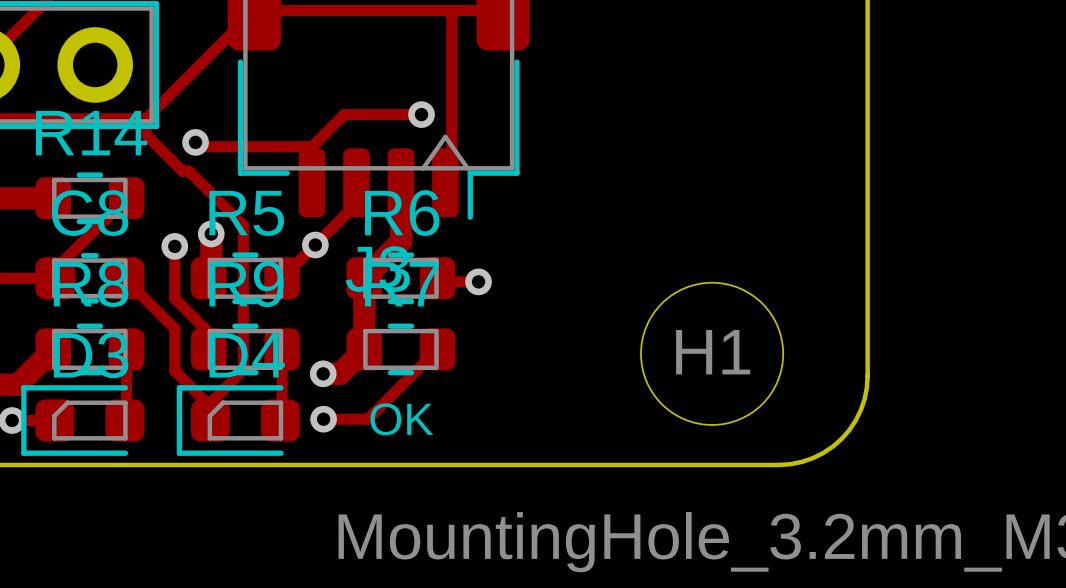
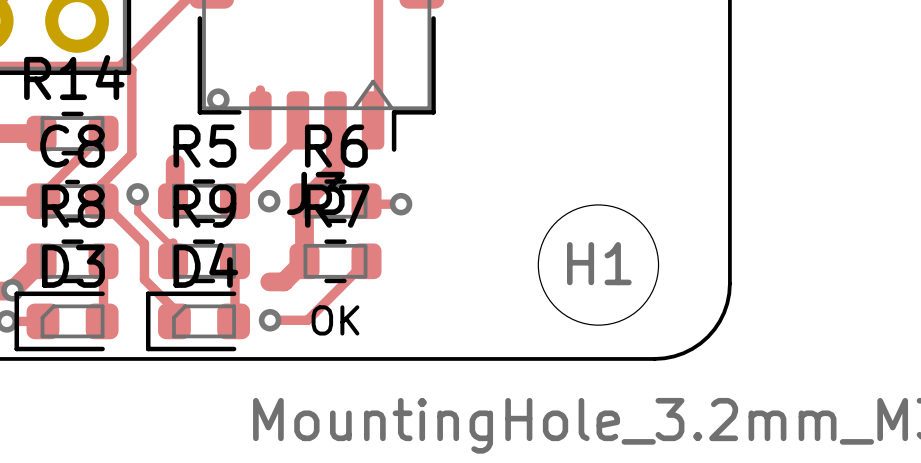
track: (421, 114) (344, 114) (312, 146) (199, 146) (195, 142) -> none
via: (421, 114) -> none
track: (146, 118) (146, 134) (182, 171) (188, 171) (243, 225) (243, 370) (208, 404) (210, 406) (210, 420) -> none
track: none -> (127, 65) (131, 69) (131, 154) (101, 184) (101, 201)
via: (195, 142) -> none
via: none -> (218, 99)
via: (211, 233) -> none
via position: (315, 245) -> (269, 201)
track: (174, 246) (174, 298) (208, 332) -> (137, 194) (137, 212) (168, 242) (173, 242) (173, 247)
via position: (174, 246) -> (137, 194)
via: (323, 373) -> none
via: none -> (12, 290)

